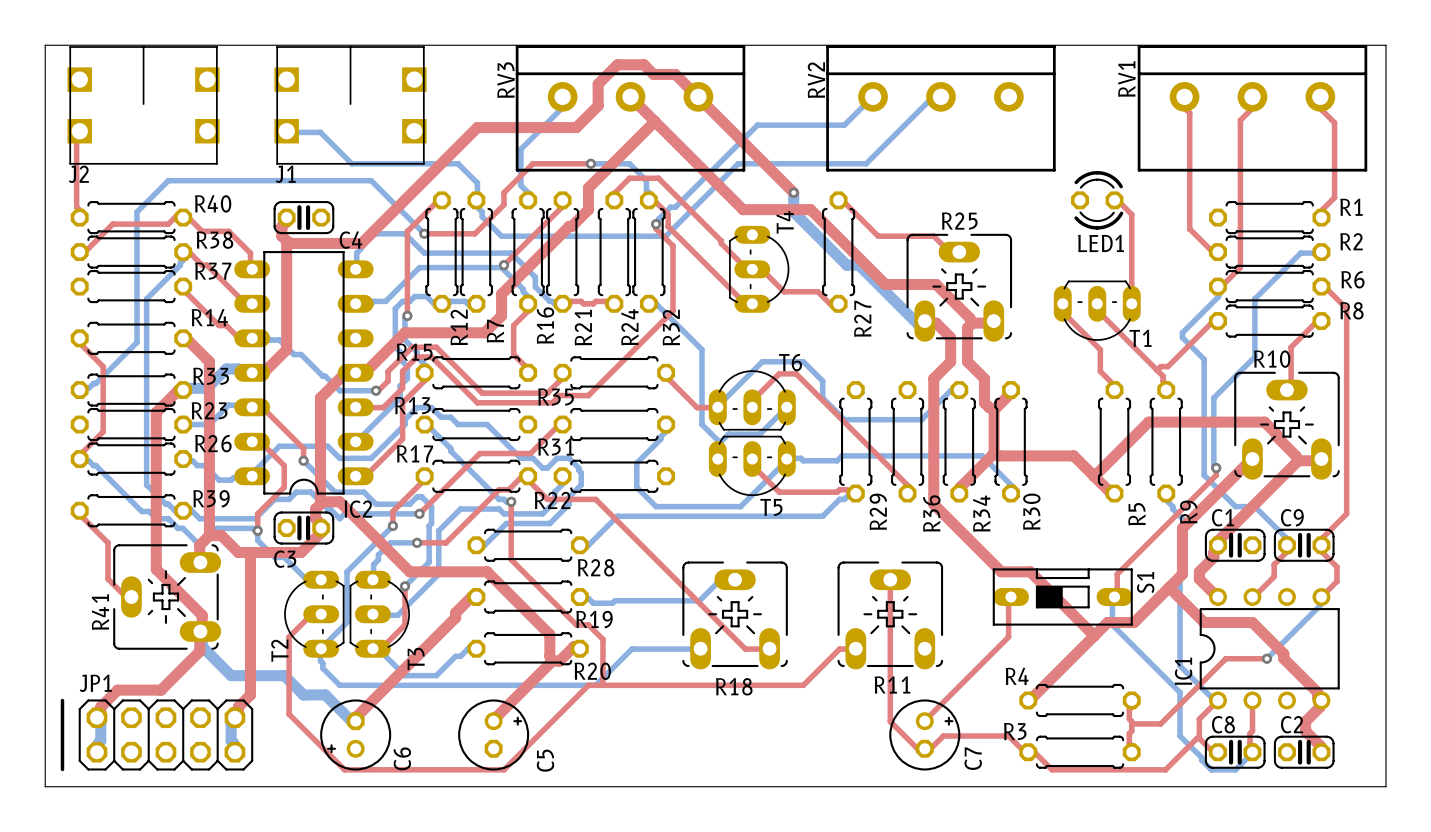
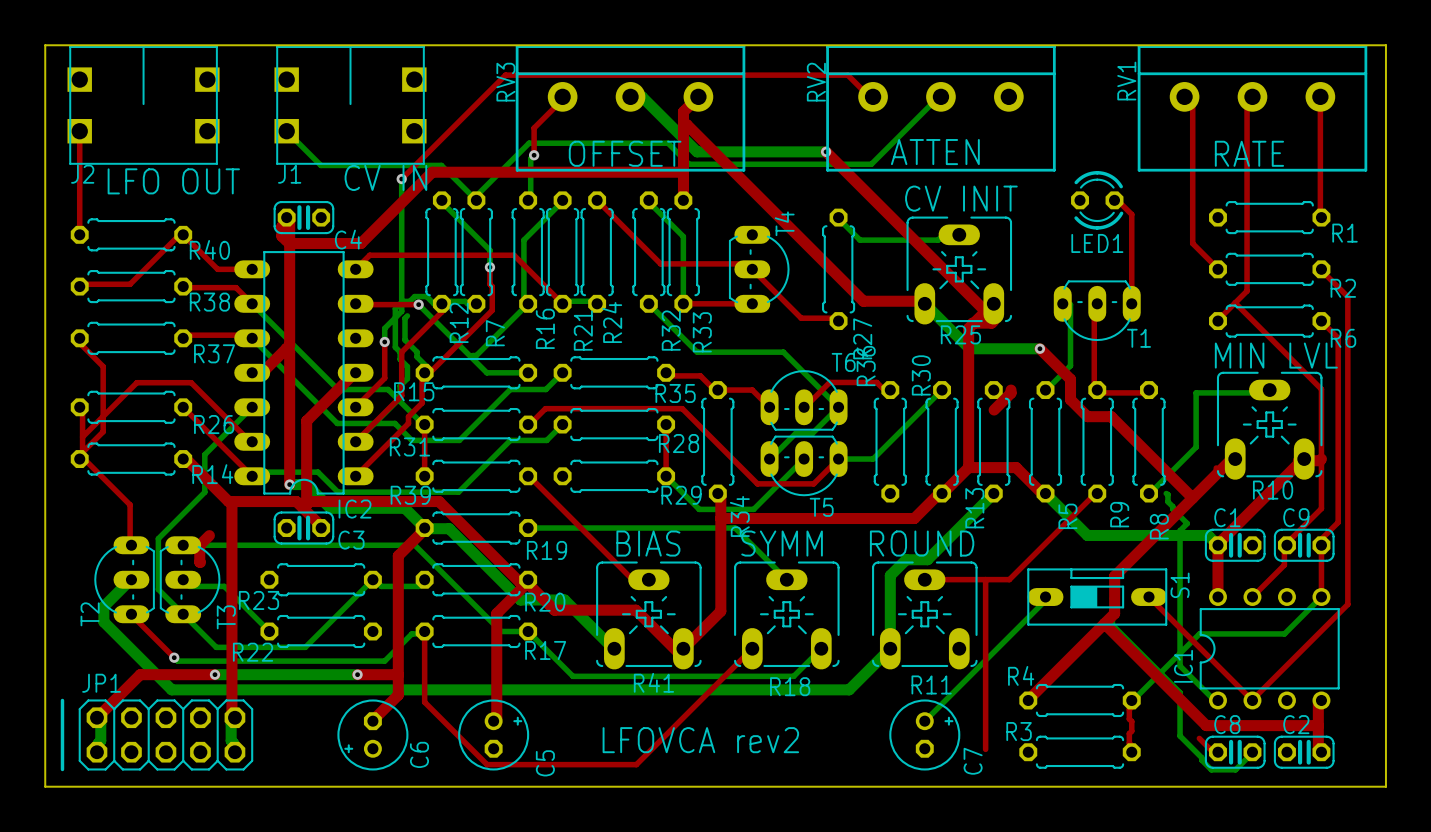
bottom track: (562, 96) (561, 108) (520, 149) (520, 185) (528, 192) (528, 200) -> (534, 155) (530, 158) (530, 197) (528, 200)
top track: none -> (562, 96) (562, 99) (534, 128) (534, 155)
bottom track: none -> (630, 96) (642, 96) (697, 151) (826, 151)
top track: (630, 96) (743, 209) (810, 209) (885, 284) (936, 284) (969, 318) (972, 323) (967, 327) (967, 361) (984, 378) (984, 402) (994, 410) (994, 453) -> none
top track: none -> (698, 96) (683, 111) (683, 200)
bottom track: (873, 96) (844, 125) (757, 125) (675, 207) (670, 207) (656, 224) -> none
top track: none -> (873, 96) (869, 96) (847, 75) (505, 75) (401, 179)
bottom track: (940, 96) (931, 98) (866, 163) (738, 163) (665, 236) (501, 236) (482, 216) (482, 212) (477, 207) (477, 183) (458, 163) (351, 163) (320, 132) (286, 131) -> (940, 96) (938, 96) (871, 164) (689, 164) (668, 143) (529, 143) (476, 195) (476, 200) (441, 165) (320, 165) (286, 131)
top track: (1184, 96) (1184, 108) (1189, 113) (1189, 228) (1211, 250) (1217, 252) -> (1184, 96) (1192, 105) (1192, 243) (1217, 269)
top track: (1252, 96) (1252, 108) (1240, 120) (1240, 267) (1223, 284) (1218, 284) (1217, 286) -> (1252, 96) (1247, 102) (1247, 291) (1217, 321)
top track: (1320, 96) (1322, 98) (1322, 110) (1334, 122) (1334, 197) (1322, 209) (1321, 217) -> (1320, 96) (1321, 217)
top track: (654, 121) (588, 187) (588, 209) (501, 294) (501, 315) (484, 332) (404, 332) (366, 371) (344, 373) (320, 397) (320, 504) (315, 509) (315, 518) (320, 523) (321, 528) (320, 533) (301, 552) (238, 552) (221, 535) (209, 535) (209, 361) (187, 340) (183, 338) -> none
top track: none -> (683, 124) (686, 124) (863, 301) (924, 301) (924, 303)
top track: (79, 131) (76, 134) (76, 207) (79, 209) (79, 217) -> (79, 131) (79, 234)
top track: none -> (826, 151) (985, 311)
text: none -> ATTEN (935, 152)
text: none -> OFFSET (625, 153)
text: none -> RATE (1249, 153)
via: none -> (534, 155)
bottom track: (590, 163) (629, 163) (646, 180) (648, 200) -> (683, 303) (683, 236) (648, 200)
top track: (590, 163) (532, 163) (503, 192) (503, 204) (475, 233) (424, 233) -> none
via: (590, 163) -> none
top track: none -> (683, 172) (432, 172) (360, 243) (289, 243)
text: none -> CV IN (385, 177)
bottom track: none -> (401, 179) (401, 311) (384, 328) (384, 341)
via: none -> (401, 179)
text: none -> LFO OUT (173, 181)
bottom track: (793, 192) (793, 212) (846, 265) (858, 265) (919, 325) (921, 325) (924, 321) -> none
top track: (793, 192) (675, 74) (653, 74) (644, 64) (617, 64) (598, 84) (598, 105) (576, 127) (477, 127) (361, 243) (291, 243) (286, 241) (286, 349) (264, 371) (252, 372) -> (286, 217) (289, 219) (289, 345) (262, 372) (252, 372)
via position: (793, 192) -> (826, 151)
text: none -> CV INIT (961, 198)
bottom track: none -> (441, 200) (489, 250) (489, 267)
top track: (441, 200) (441, 202) (436, 202) (407, 231) (407, 315) -> none
bottom track: none -> (562, 200) (523, 240) (523, 301) (527, 301) (528, 303) (476, 355) (471, 357)
top track: (562, 200) (561, 207) (503, 265) -> none
top track: none -> (597, 200) (660, 263) (746, 263) (801, 318) (835, 318) (838, 321)
top track: (614, 200) (615, 192) (629, 178) (658, 178) (745, 267) (762, 270) (784, 291) (817, 291) (829, 303) (838, 303) -> none
top track: (648, 200) (648, 202) (656, 202) (668, 214) (668, 226) (745, 303) -> (683, 303) (745, 303)
top track: (838, 200) (839, 202) (844, 202) (878, 236) (933, 236) (948, 250) (959, 252) -> none
R40 name position: R40 (213, 203) -> R40 (209, 249)
R1 name position: R1 (1351, 207) -> R1 (1345, 233)
R40 position: (131, 217) -> (131, 234)
bottom track: none -> (838, 217) (860, 240) (938, 240) (944, 233) (959, 234)
R25 name position: R25 (959, 221) -> R25 (960, 334)
top track: (656, 224) (656, 228) (673, 245) (673, 311) (588, 395) (559, 395) (552, 402) (477, 402) (431, 356) (417, 356) (402, 371) (402, 388) (383, 407) (355, 407) -> (384, 341) (384, 378) (355, 407)
via: (656, 224) -> none
bottom track: (424, 233) (371, 180) (168, 180) (136, 212) (136, 342) (95, 383) (88, 388) (79, 390) -> none
via: (424, 233) -> none
R2 name position: R2 (1351, 241) -> R2 (1343, 288)
top track: (79, 252) (86, 250) (112, 224) (168, 224) (175, 216) (182, 216) (185, 219) (190, 219) (202, 231) (228, 231) (250, 253) (250, 267) (252, 269) -> (79, 286) (82, 284) (130, 284) (181, 233) (217, 269) (252, 269)
R38: (131, 252) -> none
bottom track: (183, 252) (180, 265) (146, 298) (146, 484) (175, 511) (190, 509) (199, 518) (255, 518) (274, 499) (289, 499) (296, 492) (310, 492) (339, 518) (344, 513) (419, 513) -> none
top track: (183, 252) (190, 253) (202, 265) (207, 265) (245, 303) (252, 303) -> (183, 286) (236, 287) (252, 303)
R24 position: (614, 252) -> (597, 252)
R27 position: (838, 252) -> (838, 269)
R2 position: (1269, 252) -> (1269, 269)
bottom track: (1321, 252) (1300, 253) (1254, 298) (1254, 356) (1213, 397) (1213, 465) (1216, 468) -> none
via position: (503, 265) -> (489, 267)
bottom track: (501, 267) (419, 267) (385, 301) (355, 303) -> none
bottom track: (501, 267) (523, 289) (528, 296) (528, 303) -> none
bottom track: (355, 269) (356, 253) (373, 233) (404, 233) (424, 253) (511, 253) (535, 277) (535, 286) (549, 301) (562, 303) -> (597, 303) (595, 301) (564, 301) (562, 303)
top track: none -> (1321, 269) (1347, 296) (1347, 604) (1252, 700) (1149, 597)
R37 name: R37 (213, 271) -> R38 (209, 302)
top track: (183, 286) (185, 286) (185, 291) (219, 325) (226, 325) (238, 337) (252, 338) -> (183, 338) (184, 335) (248, 335) (252, 338)
bottom track: (1217, 286) (1218, 296) (1182, 332) (1182, 337) (1204, 359) (1204, 475) (1235, 506) (1254, 506) (1286, 538) (1286, 545) -> none
R6: (1269, 286) -> none
top track: (1321, 286) (1324, 286) (1346, 308) (1346, 513) (1338, 522) -> (1321, 321) (1338, 338) (1338, 522)
R25 position: (959, 287) -> (959, 270)
top track: none -> (355, 303) (418, 304)
top track: none -> (441, 303) (441, 311) (401, 352) (401, 395) (355, 441)
top track: (528, 303) (528, 311) (513, 325) (513, 354) (528, 369) (528, 372) -> none
top track: (562, 303) (569, 303) (571, 301) (581, 301) (583, 303) (605, 301) (607, 303) (614, 303) -> (562, 303) (514, 255) (369, 255) (355, 269)
bottom track: (648, 303) (656, 303) (701, 349) (701, 424) (718, 441) (717, 459) (721, 441) (728, 434) (759, 434) (786, 407) -> (648, 303) (697, 352) (783, 352) (838, 407) (812, 433) (795, 433) (769, 459)
bottom track: none -> (924, 303) (969, 348) (1039, 348)
top track: none -> (993, 303) (968, 328) (968, 467)
bottom track: none -> (1062, 303) (1070, 304) (1070, 365) (1045, 390)
top track: (1062, 303) (1064, 313) (1100, 349) (1100, 371) (1112, 383) (1114, 390) -> none
top track: (1097, 303) (1097, 311) (1163, 376) (1166, 390) -> (1097, 303) (1094, 304) (1094, 389) (1097, 390) (1097, 392) (1148, 392) (1149, 390)
bottom track: none -> (418, 304) (486, 372) (528, 372)
R8 name: R8 (1351, 310) -> R6 (1343, 338)
via position: (407, 315) -> (418, 304)
R14 name: R14 (209, 317) -> R37 (214, 353)
top track: (924, 321) (926, 323) (936, 323) (950, 337) (950, 361) (933, 378) (933, 504) (1001, 571) (1030, 571) (1094, 635) -> none
top track: (1217, 321) (1211, 323) (1167, 366) (1160, 366) (1157, 370) -> none
top track: (1321, 321) (1320, 323) (1315, 323) (1291, 347) (1291, 385) (1286, 390) -> none
bottom track: (252, 338) (267, 337) (269, 340) (279, 340) (293, 354) (301, 354) (339, 390) (376, 390) -> (252, 338) (337, 423) (394, 423) (411, 440) (459, 440) (510, 389) (545, 389) (562, 372)
via: none -> (384, 341)
top track: none -> (286, 348) (289, 352) (289, 484)
top track: none -> (1039, 348) (1070, 379) (1070, 399) (1087, 416) (1111, 416) (1192, 498)
via: none -> (1039, 348)
R15 name position: R15 (414, 352) -> R15 (414, 391)
text: none -> MIN LVL (1276, 355)
R10 name position: R10 (1272, 359) -> R10 (1273, 490)
bottom track: (252, 372) (240, 371) (238, 369) (226, 369) (207, 388) (185, 388) (183, 390) -> none
top track: none -> (355, 372) (306, 421) (306, 504) (303, 508)
top track: (424, 372) (424, 381) (402, 402) (402, 439) (366, 475) (356, 475) -> (489, 267) (492, 310) (429, 372) (424, 372) (422, 375) (422, 403) (408, 416) (408, 423) (356, 475)
top track: (562, 372) (561, 378) (547, 393) (482, 393) (436, 347) (412, 347) (388, 371) (388, 381) (378, 390) (376, 390) -> none
top track: (666, 372) (668, 373) (668, 378) (697, 407) (717, 407) -> (666, 372) (666, 375) (700, 375) (717, 392) (717, 390) (752, 390) (769, 407)
R33 rotation: 0° (131, 390) -> 90° clockwise (683, 252)
R33 position: (131, 390) -> (683, 252)
top track: (183, 390) (178, 390) (156, 412) (156, 569) (202, 615) (202, 624) (204, 629) (199, 632) (199, 651) (161, 690) (117, 690) (100, 707) (100, 711) (96, 717) -> (214, 674) (140, 674) (97, 717)
via: (376, 390) -> none
top track: none -> (890, 390) (884, 390) (876, 382) (829, 382) (804, 407)
bottom track: none -> (942, 390) (873, 459) (838, 459)
bottom track: (959, 390) (950, 390) (921, 419) (844, 419) (822, 397) (822, 381) (803, 361) (762, 361) (717, 407) -> none
bottom track: none -> (1269, 390) (1267, 392) (1196, 392) (1196, 447) (1149, 493)
R35 name position: R35 (556, 396) -> R35 (675, 393)
T6 position: (752, 400) -> (804, 400)
R13 name: R13 (412, 405) -> R31 (409, 446)
top track: none -> (79, 407) (82, 409) (82, 457) (130, 504) (131, 545)
R26: none -> (131, 407)
top track: none -> (183, 407) (252, 476)
bottom track: (252, 407) (250, 405) (228, 405) (209, 424) (183, 424) -> (252, 407) (204, 454) (204, 492) (158, 538) (158, 589) (216, 647) (305, 647) (372, 579) (374, 583) (377, 583) (381, 586) (418, 586) (424, 579)
top track: (252, 407) (262, 407) (303, 448) (303, 460) -> none
top track: (752, 407) (752, 400) (779, 373) (796, 373) (909, 487) (909, 492) (907, 493) -> none
R23 name position: R23 (209, 410) -> R23 (258, 600)
R23 position: (131, 424) -> (321, 579)
bottom track: (424, 424) (450, 448) (450, 451) (499, 499) (511, 501) -> (424, 424) (388, 389) (337, 389) (252, 303)
top track: none -> (528, 424) (545, 408) (682, 408) (757, 483) (813, 483) (838, 459)
top track: (562, 424) (559, 424) (530, 453) (479, 453) (419, 513) -> none
bottom track: (666, 424) (665, 431) (660, 439) (636, 463) (636, 487) (656, 506) (740, 506) (786, 459) (837, 460) (842, 455) (982, 455) (1013, 487) (1011, 493) -> none
top track: none -> (666, 424) (666, 476)
R10 position: (1286, 425) -> (1269, 425)
top track: (252, 441) (252, 443) (262, 443) (284, 465) (284, 487) (257, 513) (257, 530) -> (252, 441) (191, 382) (136, 382) (82, 437)
R29: (855, 441) -> none
R36 position: (907, 441) -> (890, 441)
R34 position: (959, 441) -> (717, 441)
R13: none -> (993, 441)
R30 position: (1011, 441) -> (942, 441)
R5 position: (1114, 441) -> (1045, 441)
R8: none -> (1149, 441)
R9 position: (1166, 441) -> (1097, 441)
R26 name: R26 (213, 443) -> R14 (212, 474)
R31 name: R31 (556, 446) -> R28 (679, 443)
R17 name: R17 (415, 453) -> R39 (410, 495)
top track: (994, 453) (960, 487) (959, 493) -> none
top track: (994, 453) (998, 455) (1073, 455) (1110, 492) (1114, 493) -> none
bottom track: (79, 459) (88, 460) (95, 465) (141, 511) (149, 511) (156, 518) (168, 518) (178, 528) (182, 528) (199, 545) (216, 528) (252, 528) (257, 530) (257, 540) (274, 557) (284, 557) (306, 579) (321, 579) -> none
bottom track: (183, 459) (192, 460) (197, 465) (204, 465) (219, 480) (231, 480) (233, 477) (250, 477) (252, 476) (250, 475) (279, 446) (327, 446) (339, 458) (371, 458) (404, 424) (404, 419) (417, 407) (431, 407) (441, 417) (450, 417) (458, 424) (487, 424) (520, 458) (532, 458) (542, 468) (547, 468) (557, 458) (569, 458) (578, 468) (581, 472) (581, 484) (569, 496) (569, 504) (549, 523) (506, 523) (484, 545) (476, 545) -> none
top track: none -> (183, 459) (186, 459) (228, 501) (296, 501) (321, 528)
top track: (752, 459) (752, 465) (779, 492) (837, 492) (839, 489) (846, 489) (855, 493) -> none
bottom track: none -> (804, 459) (753, 509) (699, 509) (666, 476)
top track: (1252, 459) (1182, 528) (1182, 574) (1134, 622) (1107, 622) (1028, 700) -> (1235, 459) (1231, 459) (1114, 576) (1114, 613) (1028, 700)
bottom track: (303, 460) (334, 492) (337, 492) -> (252, 476) (256, 472) (317, 472) (337, 492)
via position: (303, 460) -> (289, 484)
T5 position: (752, 465) -> (804, 465)
top track: none -> (968, 467) (914, 518) (720, 518)
top track: none -> (968, 467) (1016, 467) (1043, 494) (1045, 493)
via: (1216, 468) -> none
top track: (424, 476) (426, 477) (392, 511) (392, 525) -> (424, 476) (424, 424)
top track: (528, 476) (528, 480) (547, 499) (595, 499) (745, 649) (769, 648) -> (528, 476) (632, 579) (648, 579)
bottom track: (562, 476) (561, 484) (554, 492) (554, 501) (542, 513) (503, 513) (499, 509) (460, 509) (438, 530) (438, 574) (397, 615) (372, 614) -> none
top track: (1094, 476) (1148, 422) (1264, 422) (1298, 460) (1218, 540) (1213, 557) (1199, 571) (1199, 579) (1217, 597) -> (1304, 459) (1217, 545) (1217, 597)
top track: (528, 477) (520, 477) (508, 489) (499, 489) (446, 542) (417, 542) -> none
bottom track: none -> (289, 484) (306, 484) (330, 508) (404, 508) (425, 528) (449, 528) (520, 599) (564, 599) (614, 648)
bottom track: (363, 492) (376, 504) (409, 504) (417, 496) (421, 496) (431, 506) (431, 523) (429, 525) (429, 562) (404, 586) -> (363, 492) (458, 492) (510, 440) (546, 440) (562, 424)
top track: none -> (717, 493) (720, 494) (720, 611) (680, 654) (635, 610) (554, 610) (530, 586) (528, 579)
bottom track: (855, 493) (849, 494) (844, 499) (839, 499) (822, 516) (617, 516) (588, 545) (579, 545) -> none
bottom track: none -> (993, 493) (927, 559) (906, 559) (890, 575) (890, 648) (849, 689) (171, 689) (103, 621) (103, 606) (131, 579)
bottom track: none -> (1045, 493) (1087, 535) (1208, 535) (1217, 545)
top track: none -> (1097, 493) (1009, 579) (924, 579)
R22 name: R22 (552, 500) -> R29 (681, 495)
top track: none -> (306, 501) (439, 501) (520, 583) (528, 579)
top track: (320, 501) (339, 501) (409, 571) (487, 571) (549, 634) (549, 656) (552, 661) -> none
top track: (511, 501) (511, 559) (576, 624) (588, 624) (602, 639) (602, 685) -> none
via: (511, 501) -> none
top track: (79, 510) (81, 516) (108, 542) (108, 579) (124, 595) (131, 597) -> none
R39: (131, 510) -> none
R30 name position: R30 (1031, 511) -> R30 (921, 375)
via: (419, 513) -> none
R36 name position: R36 (931, 513) -> R36 (866, 366)
bottom track: (392, 525) (347, 571) (347, 622) (321, 648) (320, 661) (322, 663) (322, 668) (339, 685) (595, 685) (631, 649) (700, 648) -> none
via: (392, 525) -> none
top track: none -> (424, 528) (398, 555) (398, 695) (372, 721)
bottom track: none -> (528, 528) (735, 528) (786, 579)
via: (257, 530) -> none
top track: (1322, 538) (1322, 552) (1336, 566) (1336, 581) (1321, 597) -> (1322, 538) (1321, 597)
bottom track: (417, 542) (390, 542) (378, 554) (378, 559) (373, 564) (372, 579) -> none
via: (417, 542) -> none
text: none -> BIAS (648, 543)
text: none -> SYMM (782, 543)
text: none -> ROUND (922, 543)
bottom track: none -> (183, 545) (414, 545) (501, 631) (528, 631) (572, 676) (793, 676) (821, 648)
R28: (528, 545) -> none
top track: (1286, 545) (1286, 552) (1274, 564) (1274, 576) (1252, 597) -> (1235, 302) (1321, 389) (1321, 508) (1286, 543) (1284, 547) (1284, 565) (1252, 597)
top track: (250, 552) (250, 694) (238, 707) (234, 717) -> (231, 501) (231, 714) (234, 717)
C3 name position: C3 (285, 559) -> C3 (351, 540)
bottom track: none -> (183, 579) (189, 586) (224, 586) (269, 631)
bottom track: (735, 579) (733, 581) (718, 581) (699, 600) (615, 600) (612, 603) (593, 603) (588, 598) (579, 597) -> none
top track: (890, 579) (890, 721) (916, 748) (931, 748) (943, 736) (1008, 736) (1023, 750) (1035, 752) (1052, 769) (1165, 769) (1196, 738) (1199, 738) (1199, 719) (1217, 700) -> none
top track: none -> (985, 579) (985, 749)
top track: (404, 586) (404, 624) (383, 646) (373, 646) (372, 648) -> none
via: (404, 586) -> none
top track: (1169, 587) (1204, 622) (1252, 622) (1283, 653) (1283, 658) (1317, 692) (1317, 697) (1321, 700) (1320, 707) (1305, 721) (1305, 731) (1320, 745) (1321, 752) -> (1321, 700) (1318, 703) (1318, 749) (1321, 752)
R41 rotation: 0° (167, 597) -> 90° clockwise (648, 615)
R41 position: (167, 597) -> (648, 615)
top track: (476, 597) (472, 595) (455, 612) (455, 617) (356, 716) (355, 721) -> none
R19 position: (528, 597) -> (476, 528)
top track: (1011, 597) (1008, 600) (1008, 637) (924, 721) -> none
bottom track: none -> (1045, 597) (1043, 602) (924, 721)
S1 position: (1062, 597) -> (1097, 597)
bottom track: (1321, 597) (1322, 603) (1266, 658) -> (1321, 597) (1284, 633) (1199, 633) (1131, 700)
R41 name position: R41 (100, 612) -> R41 (653, 682)
top track: none -> (131, 614) (174, 657)
T2 position: (314, 614) -> (124, 579)
top track: (321, 614) (310, 615) (289, 637) (289, 714) (344, 769) (503, 769) (588, 685) (803, 685) (839, 649) (855, 648) -> none
T3 position: (379, 614) -> (190, 579)
R18 position: (735, 615) -> (786, 615)
R11 position: (890, 615) -> (924, 615)
top track: none -> (1104, 623) (1206, 725) (1318, 725)
bottom track: (200, 631) (202, 632) (202, 646) (231, 675) (284, 675) (303, 694) (325, 694) (354, 723) (355, 721) -> none
R22: none -> (321, 631)
bottom track: none -> (424, 631) (422, 633) (411, 633) (384, 661) (177, 661) (174, 657)
top track: none -> (424, 631) (424, 702) (487, 764) (636, 764) (752, 648)
R17: none -> (476, 631)
bottom track: (372, 648) (378, 649) (404, 675) (436, 675) (455, 656) (460, 656) (467, 649) (476, 648) -> none
R20 position: (528, 648) -> (476, 579)
top track: (579, 648) (574, 646) (559, 661) (552, 661) -> none
via: none -> (174, 657)
T3 name position: T3 (416, 658) -> T3 (226, 617)
top track: (1266, 658) (1225, 658) (1160, 723) (1131, 723) -> none
via: (1266, 658) -> none
top track: (552, 661) (493, 721) -> (528, 579) (528, 582) (496, 613) (496, 718) (493, 721)
bottom track: none -> (214, 674) (357, 674)
via: none -> (214, 674)
top track: none -> (357, 674) (398, 674)
via: none -> (357, 674)
top track: (1252, 700) (1252, 731) (1250, 733) (1252, 752) -> none
C6 position: (355, 734) -> (372, 734)
text: none -> LFOVCA rev2 (700, 740)

